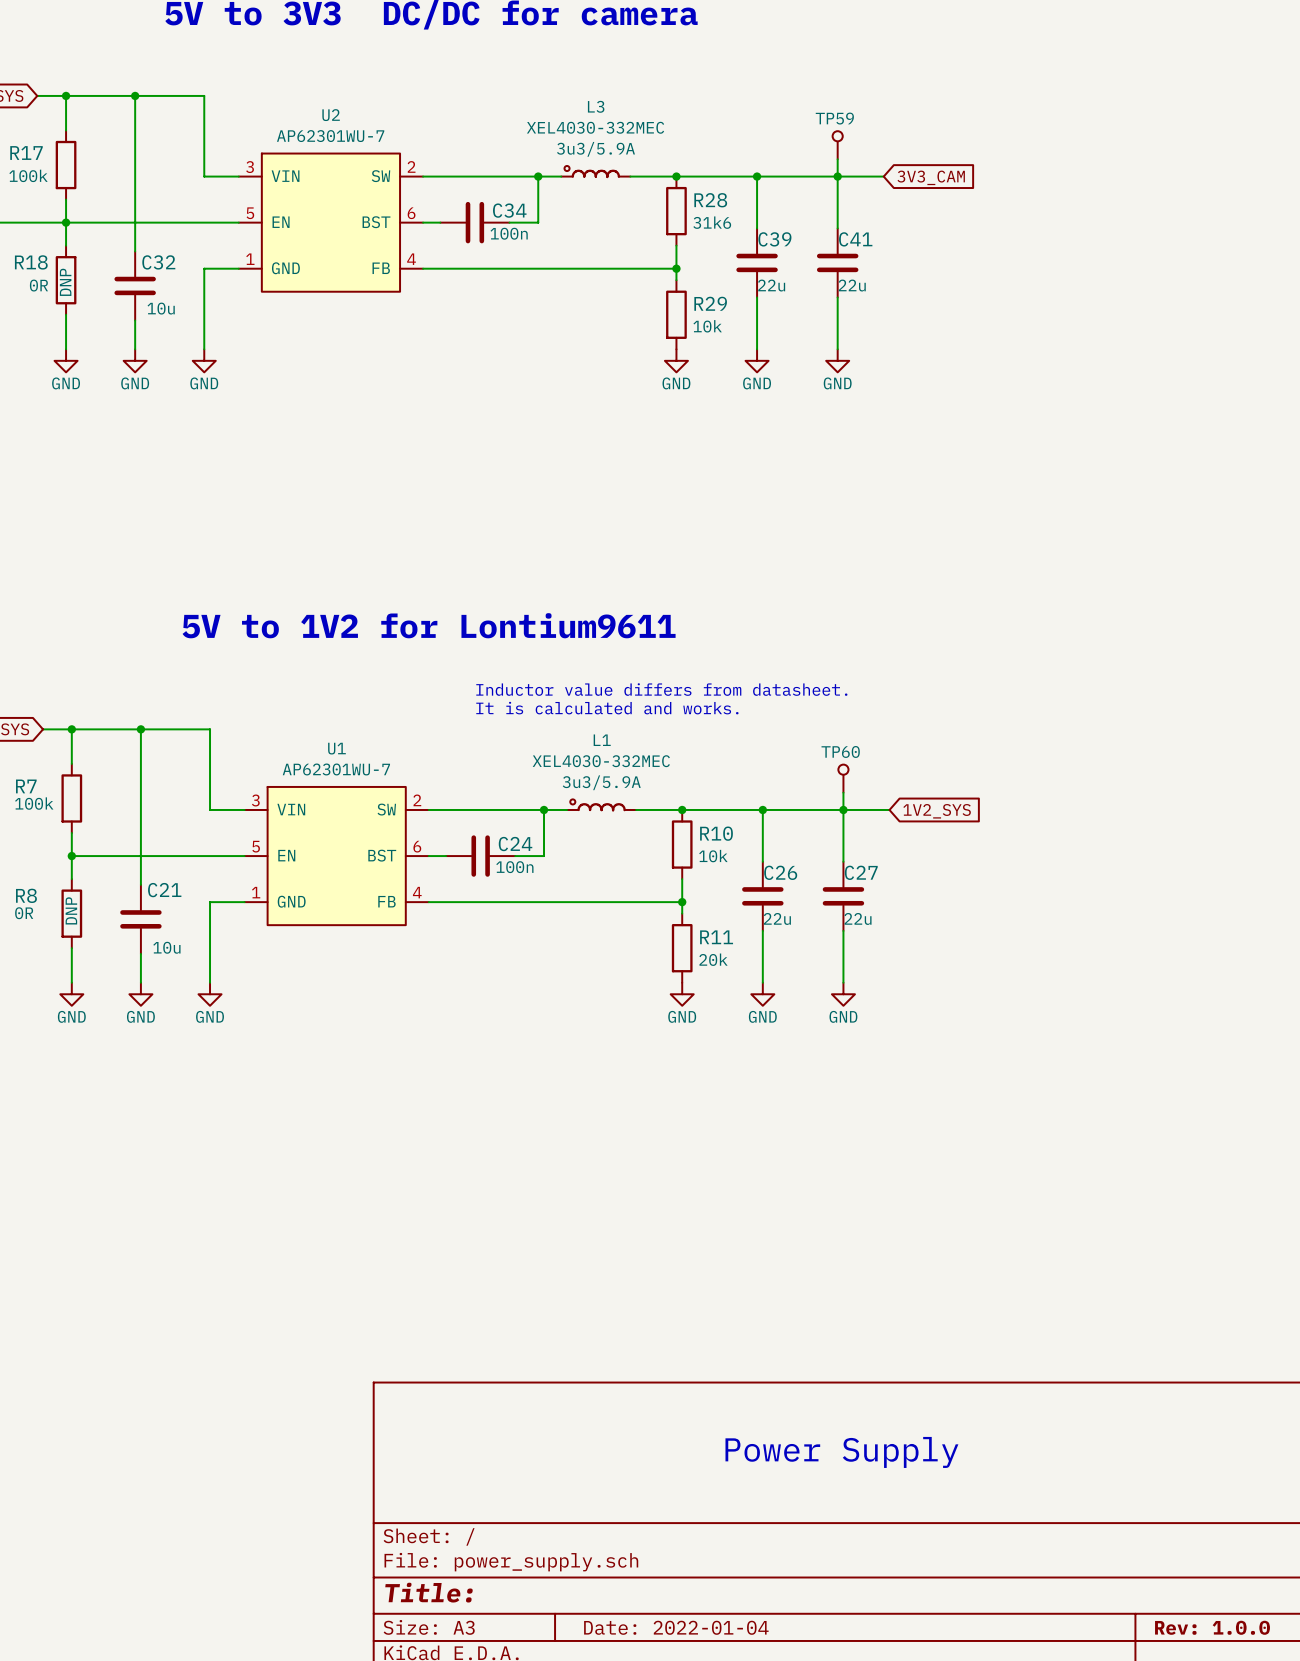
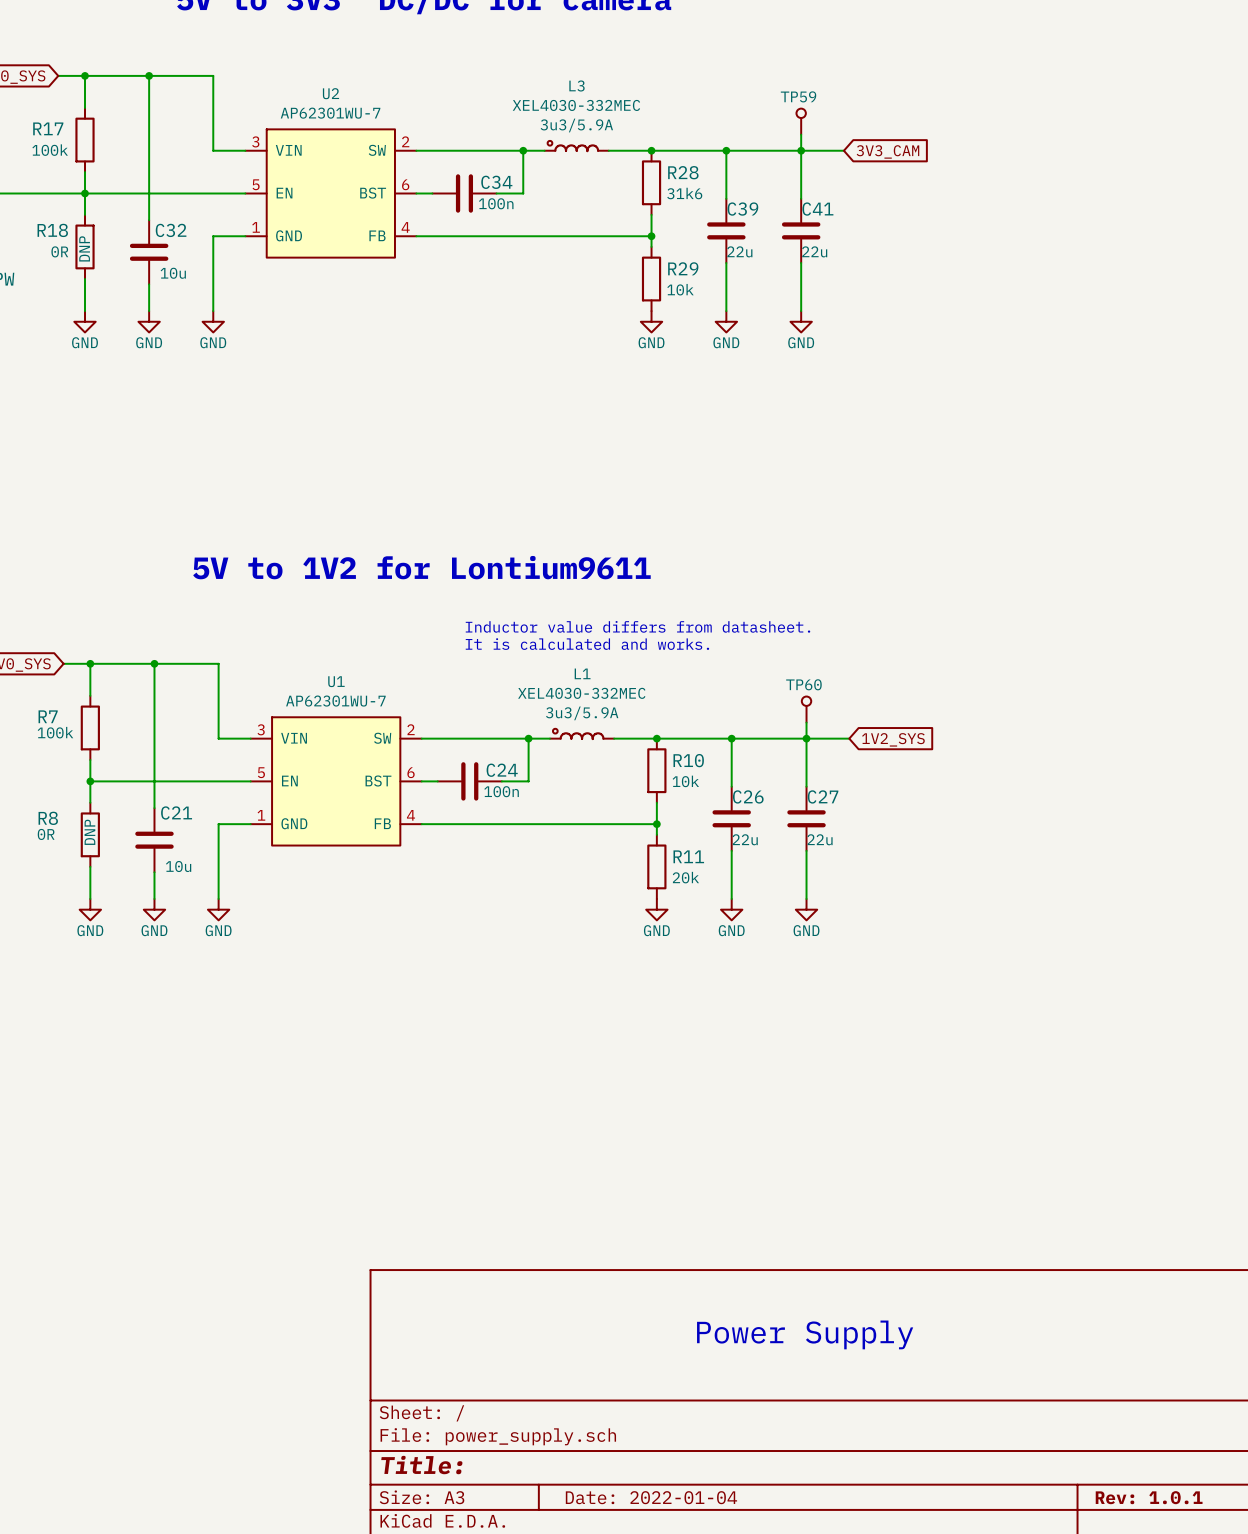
title block: Rev: 1.0.0 (1212, 1627) -> Rev: 1.0.1 (1149, 1497)

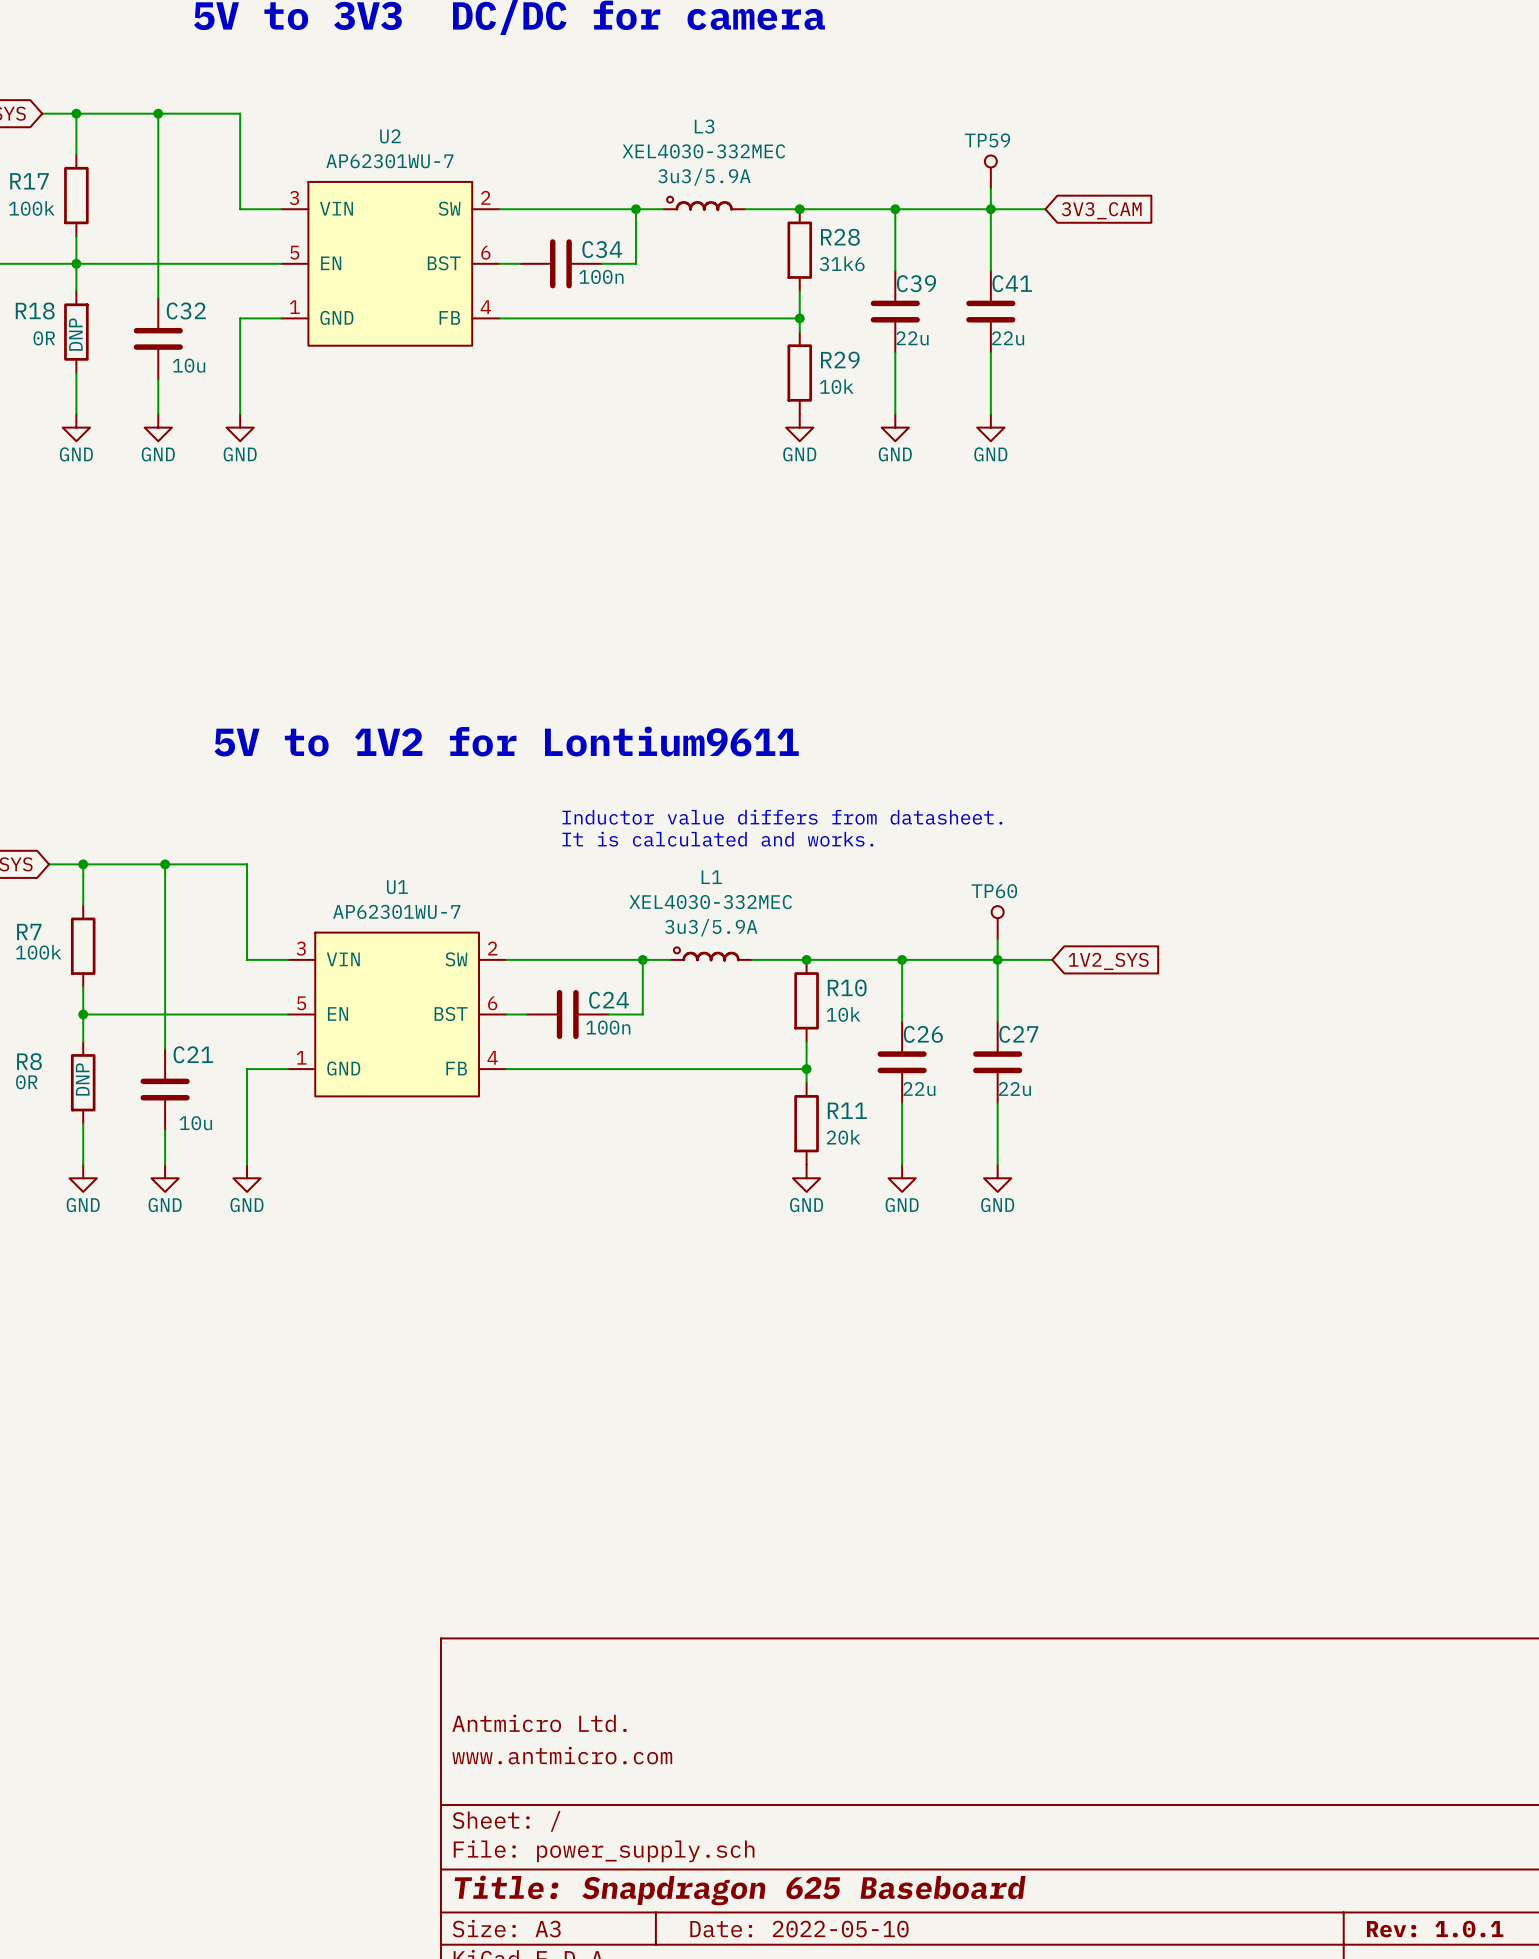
text: Power Supply (805, 1334) -> none
title block: none -> Antmicro Ltd. (539, 1723)
title block: none -> www.antmicro.com (562, 1755)
title block: Title: (421, 1465) -> Title: Snapdragon 625 Baseboard (740, 1890)
title block: Date: 2022-01-04 (651, 1497) -> Date: 2022-05-10 (799, 1929)

